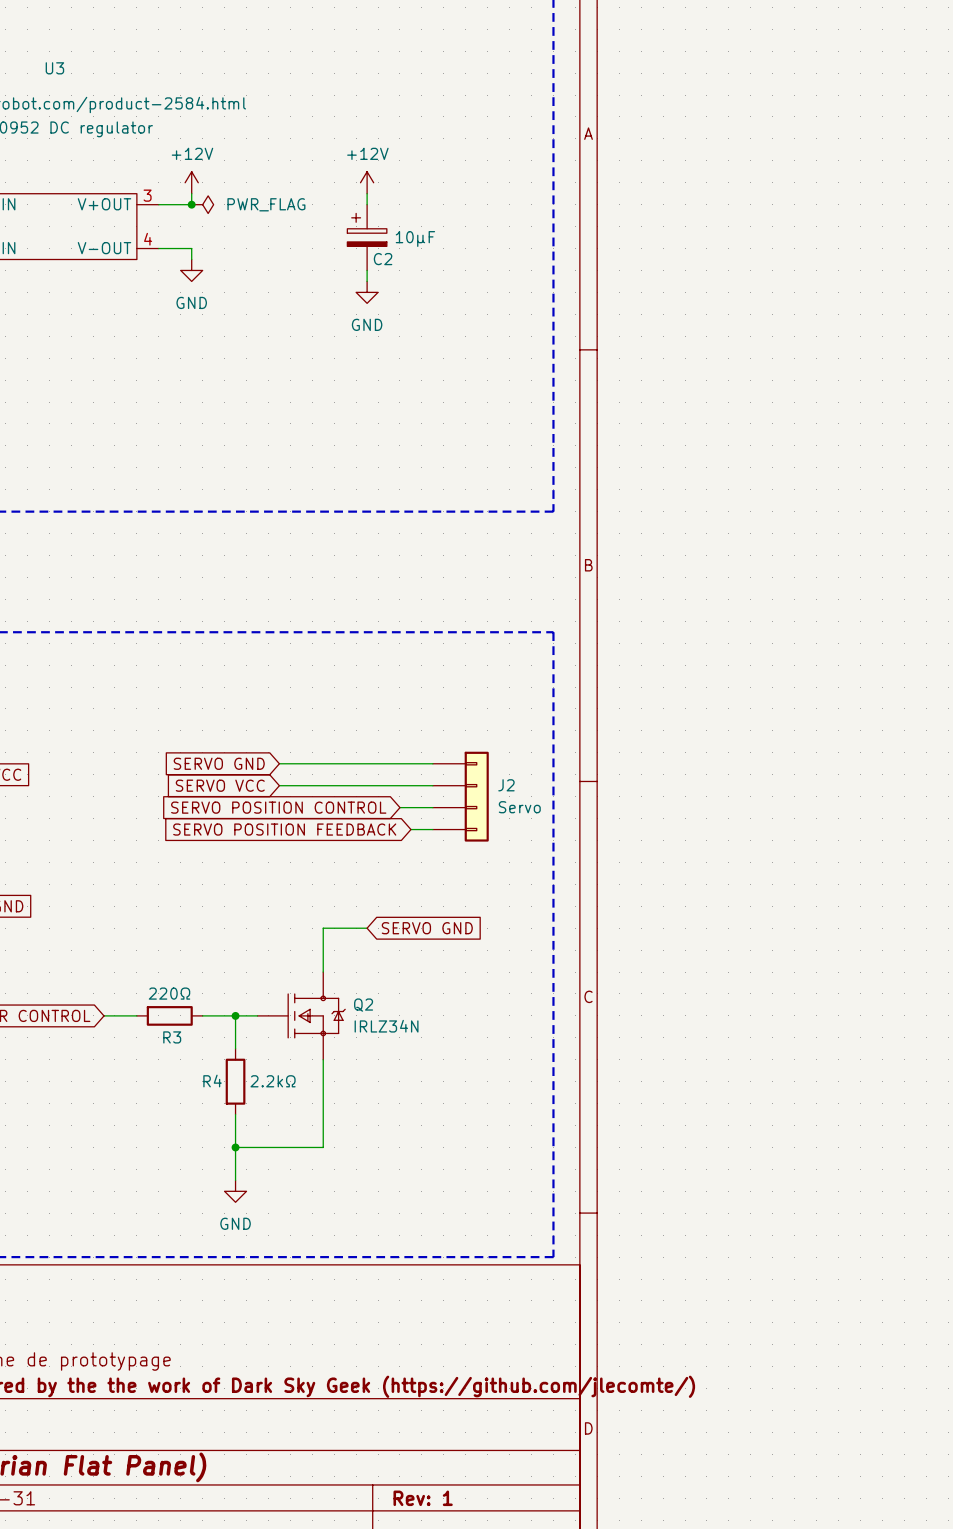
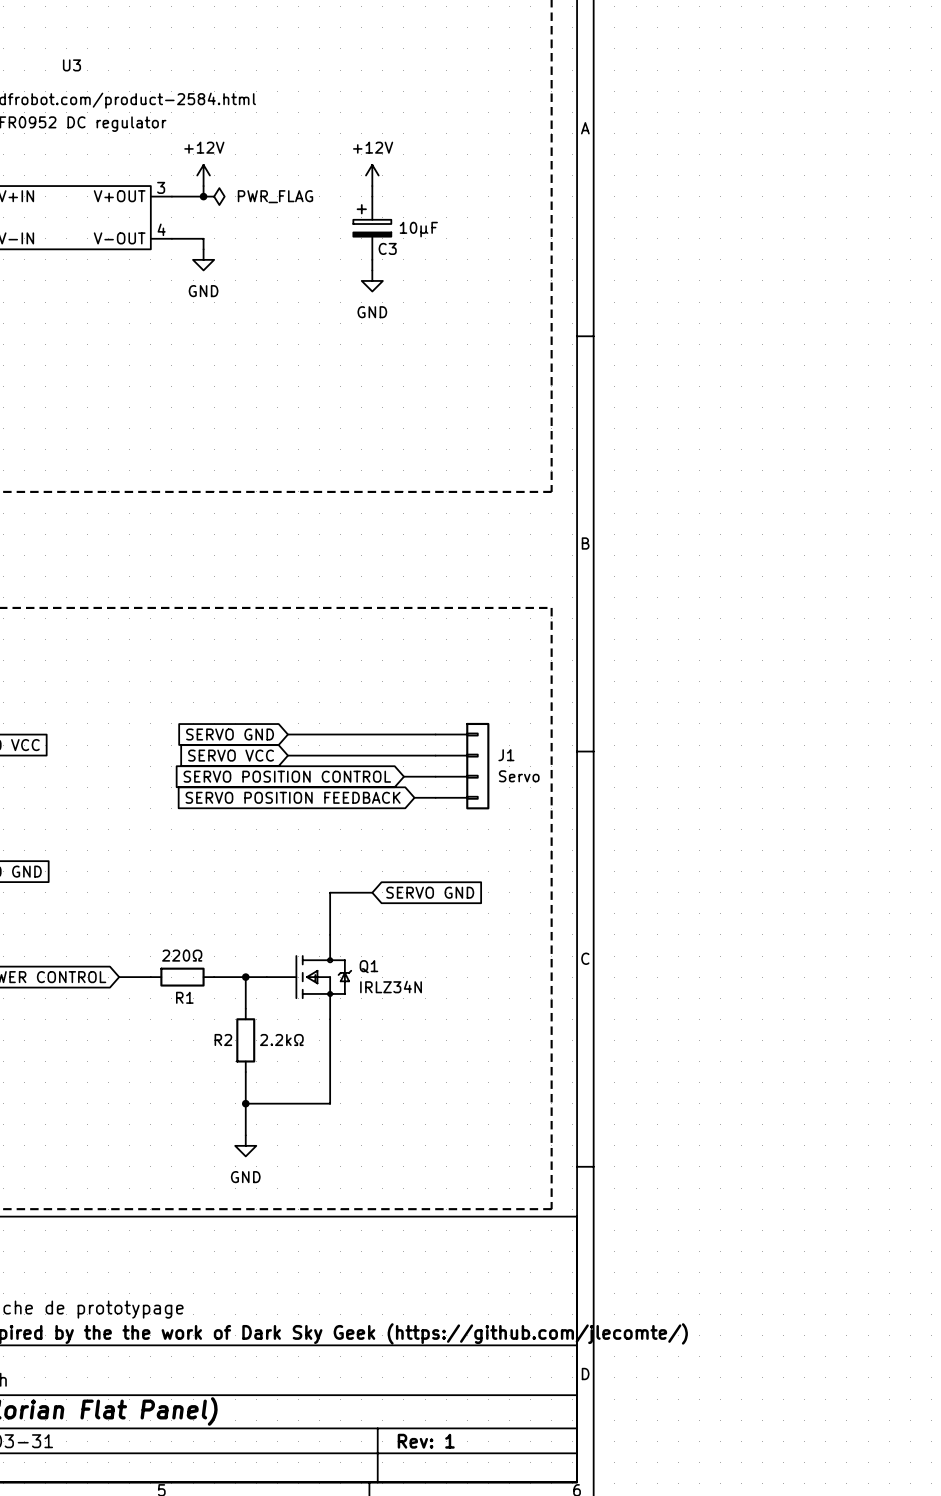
C2 name: C2 (383, 259) -> C3 (387, 248)
J2 name: J2 (506, 785) -> J1 (506, 755)
Q2 name: Q2 (363, 1005) -> Q1 (368, 966)
R3 name: R3 (172, 1037) -> R1 (184, 997)
R4 name: R4 (212, 1081) -> R2 (223, 1039)

